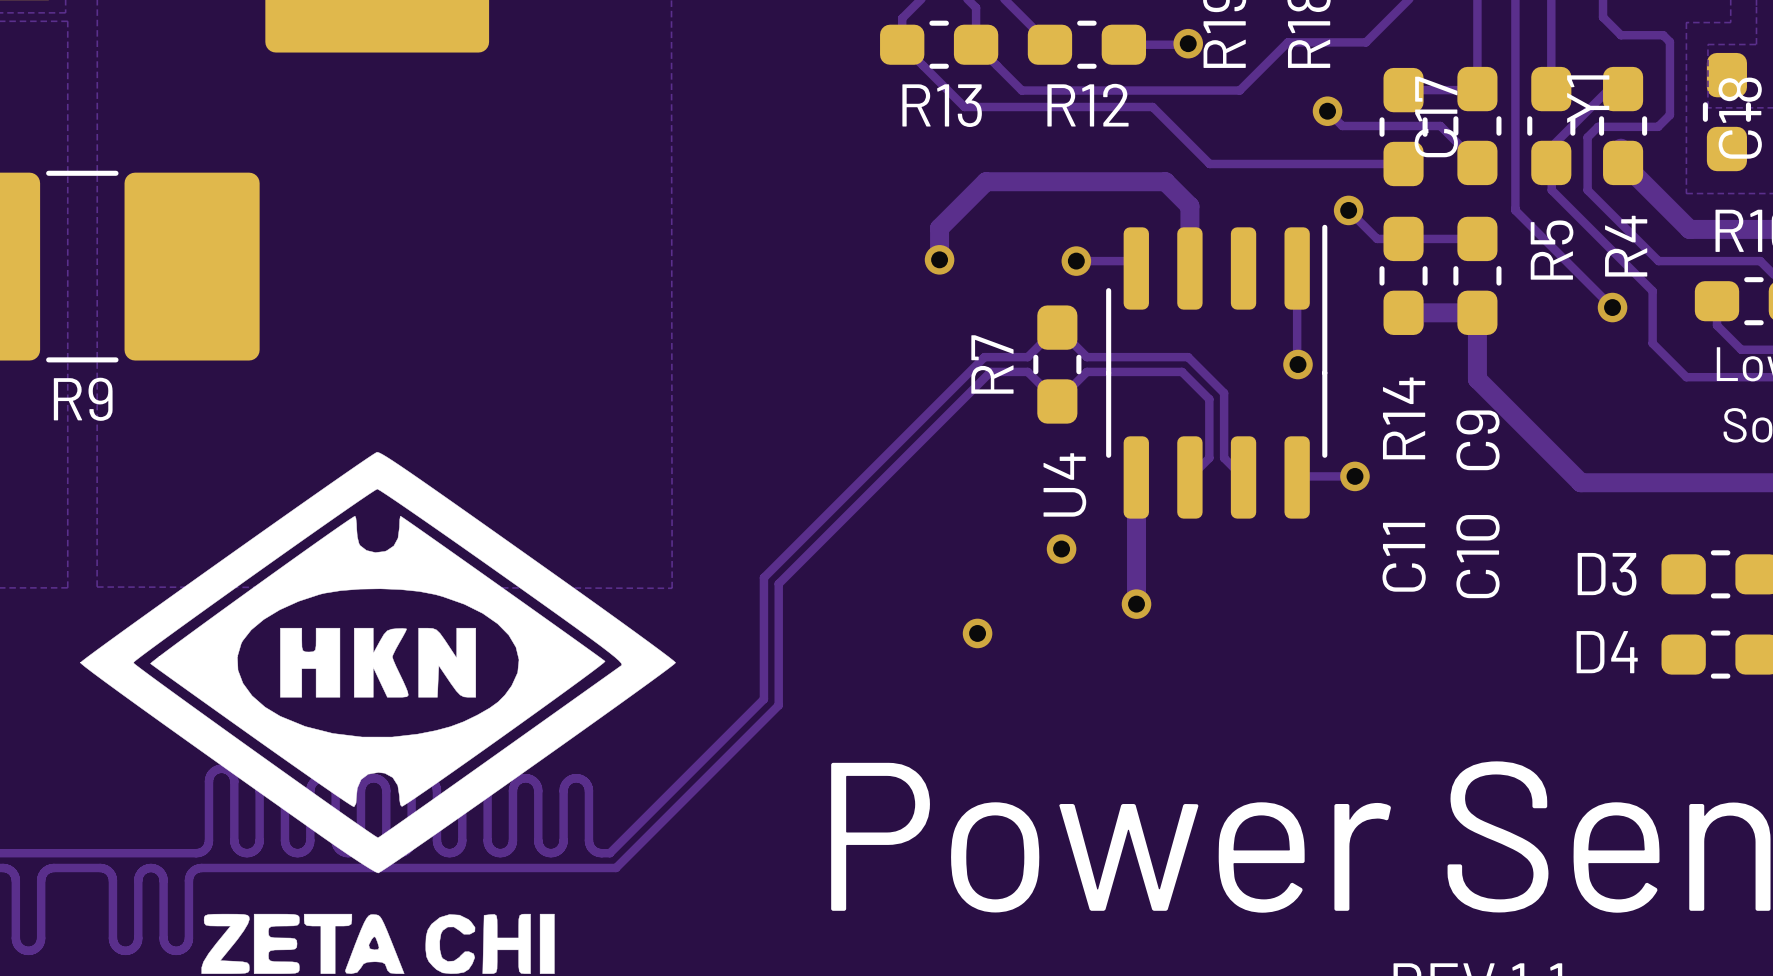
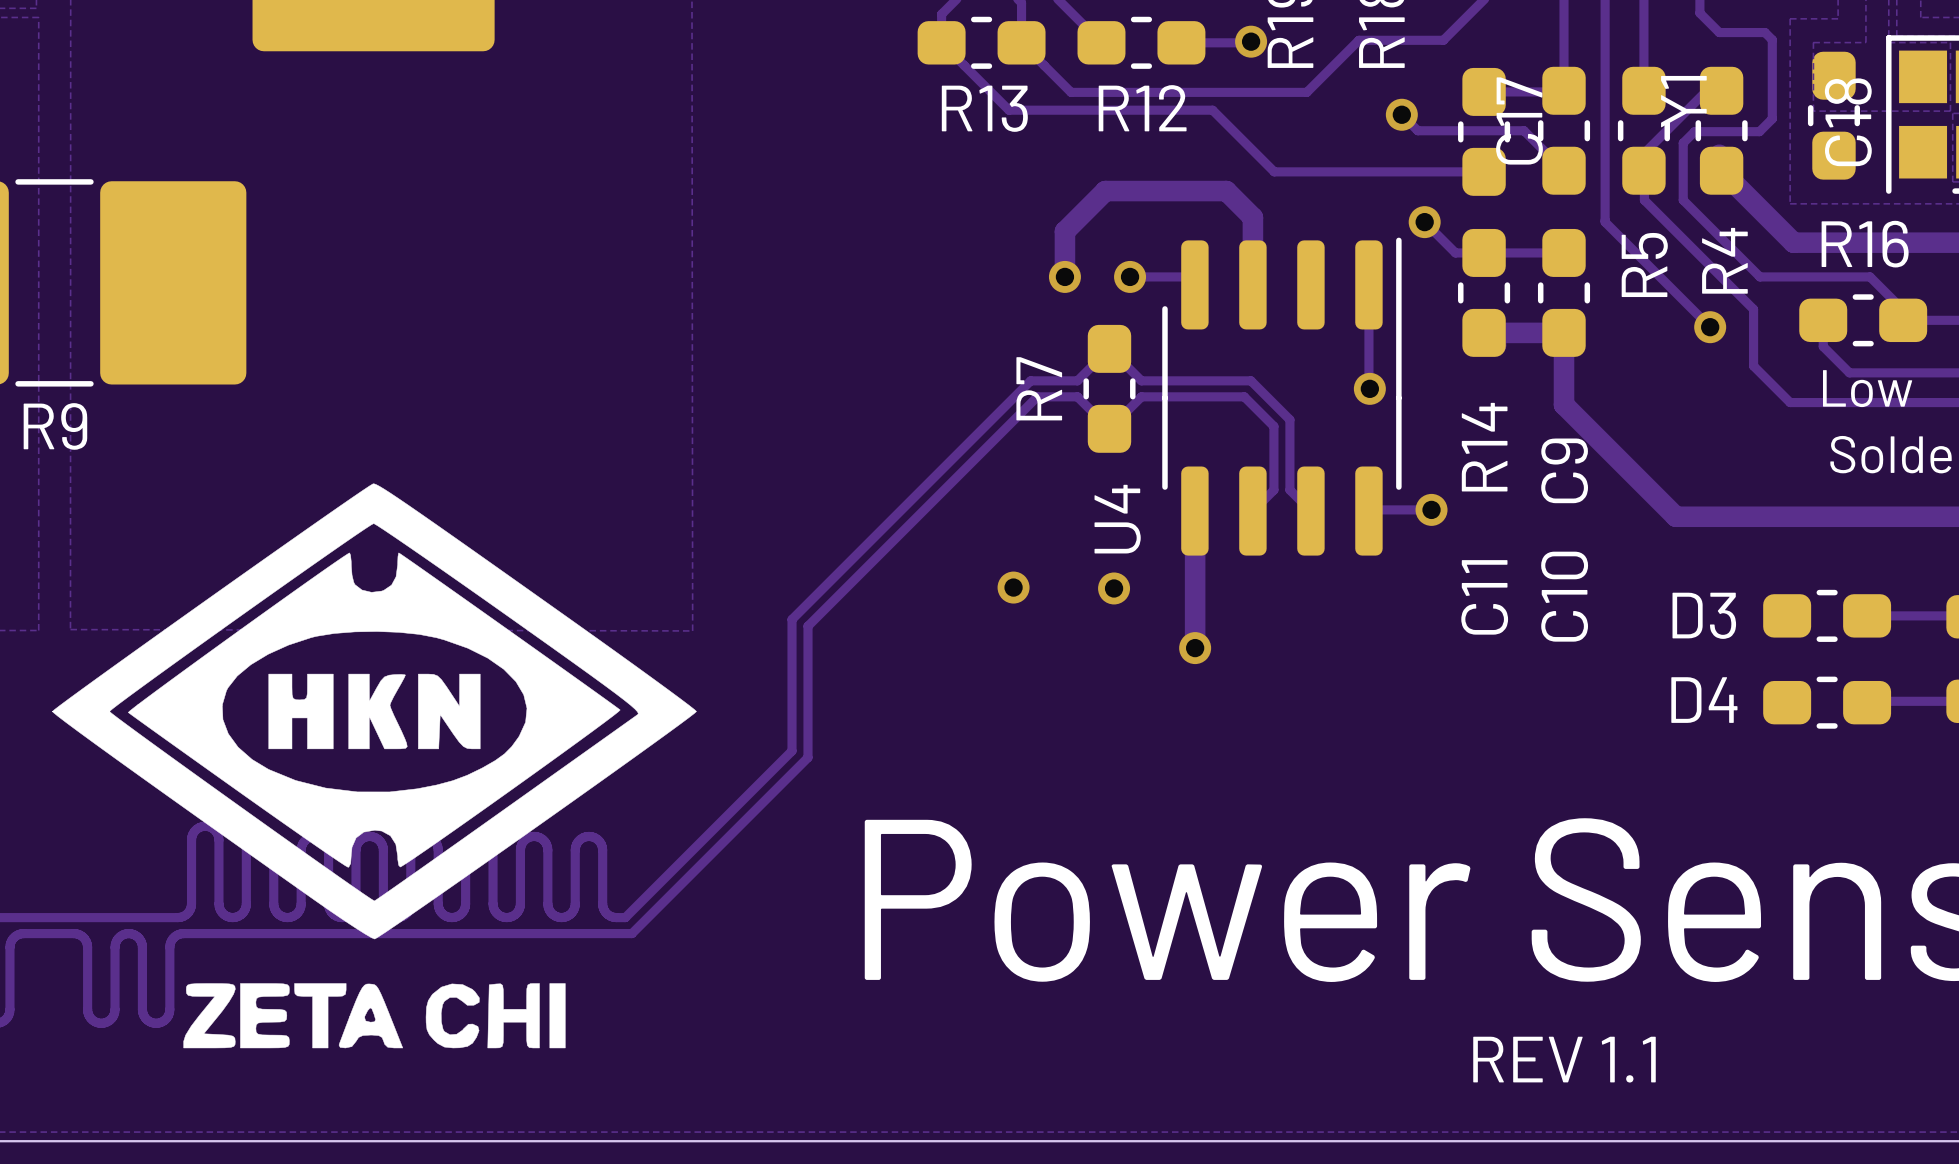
track: (1053, 181) (986, 181) (939, 228) (939, 259) -> (1105, 191) (1064, 231) (1064, 276)
via position: (939, 259) -> (1064, 276)
via position: (977, 633) -> (1013, 587)

